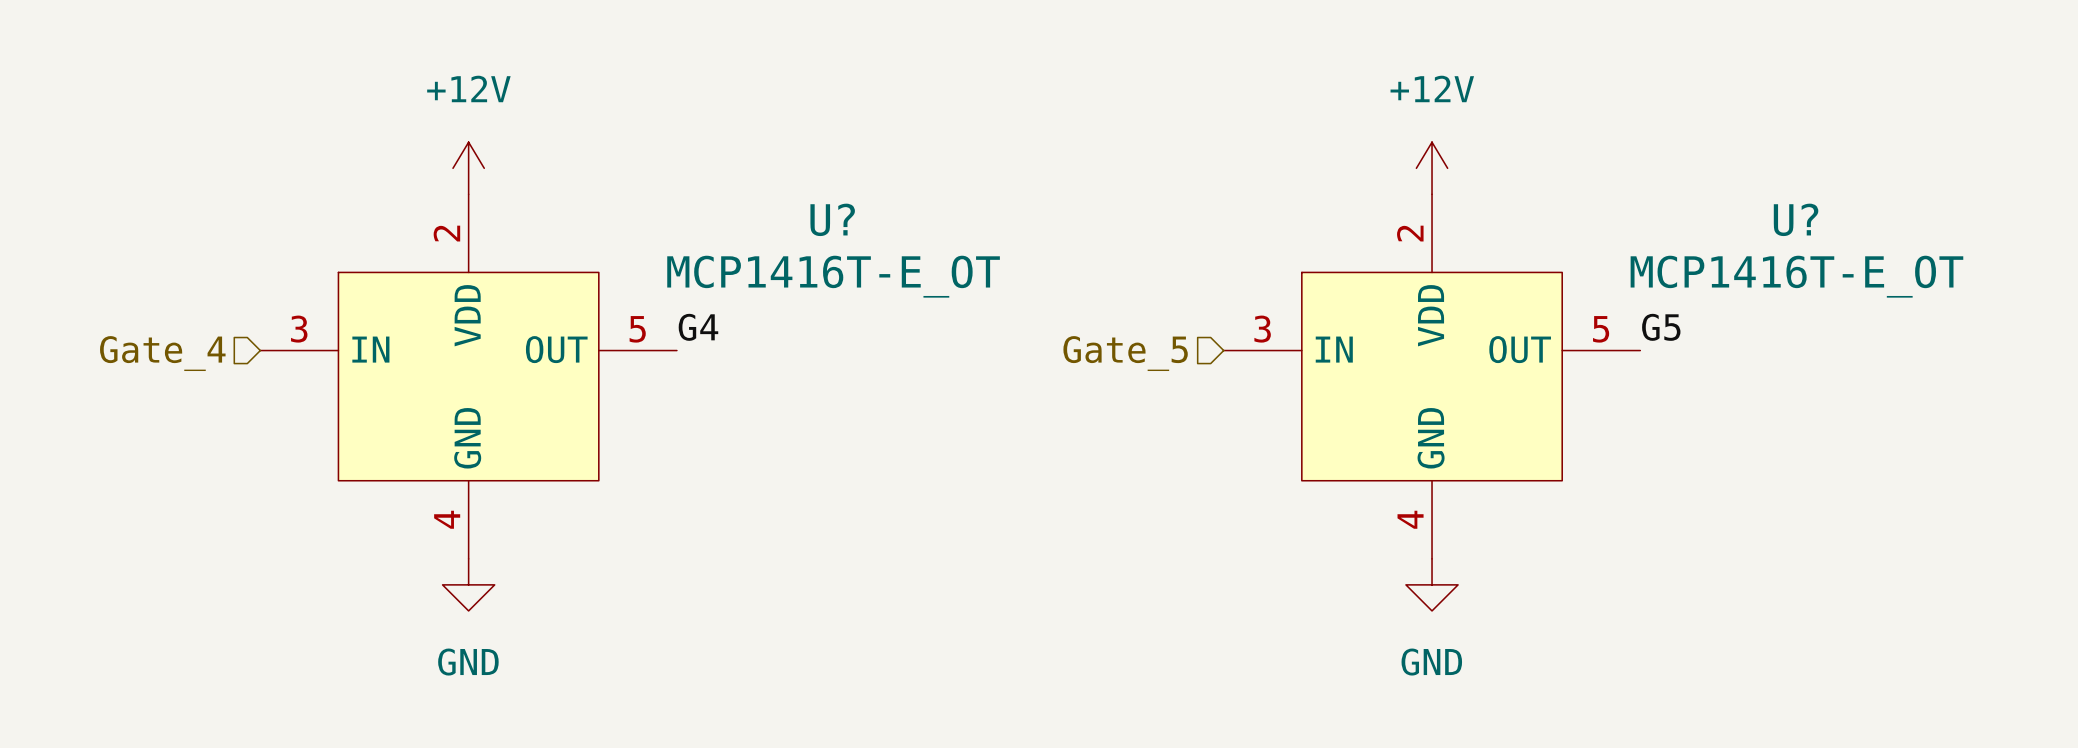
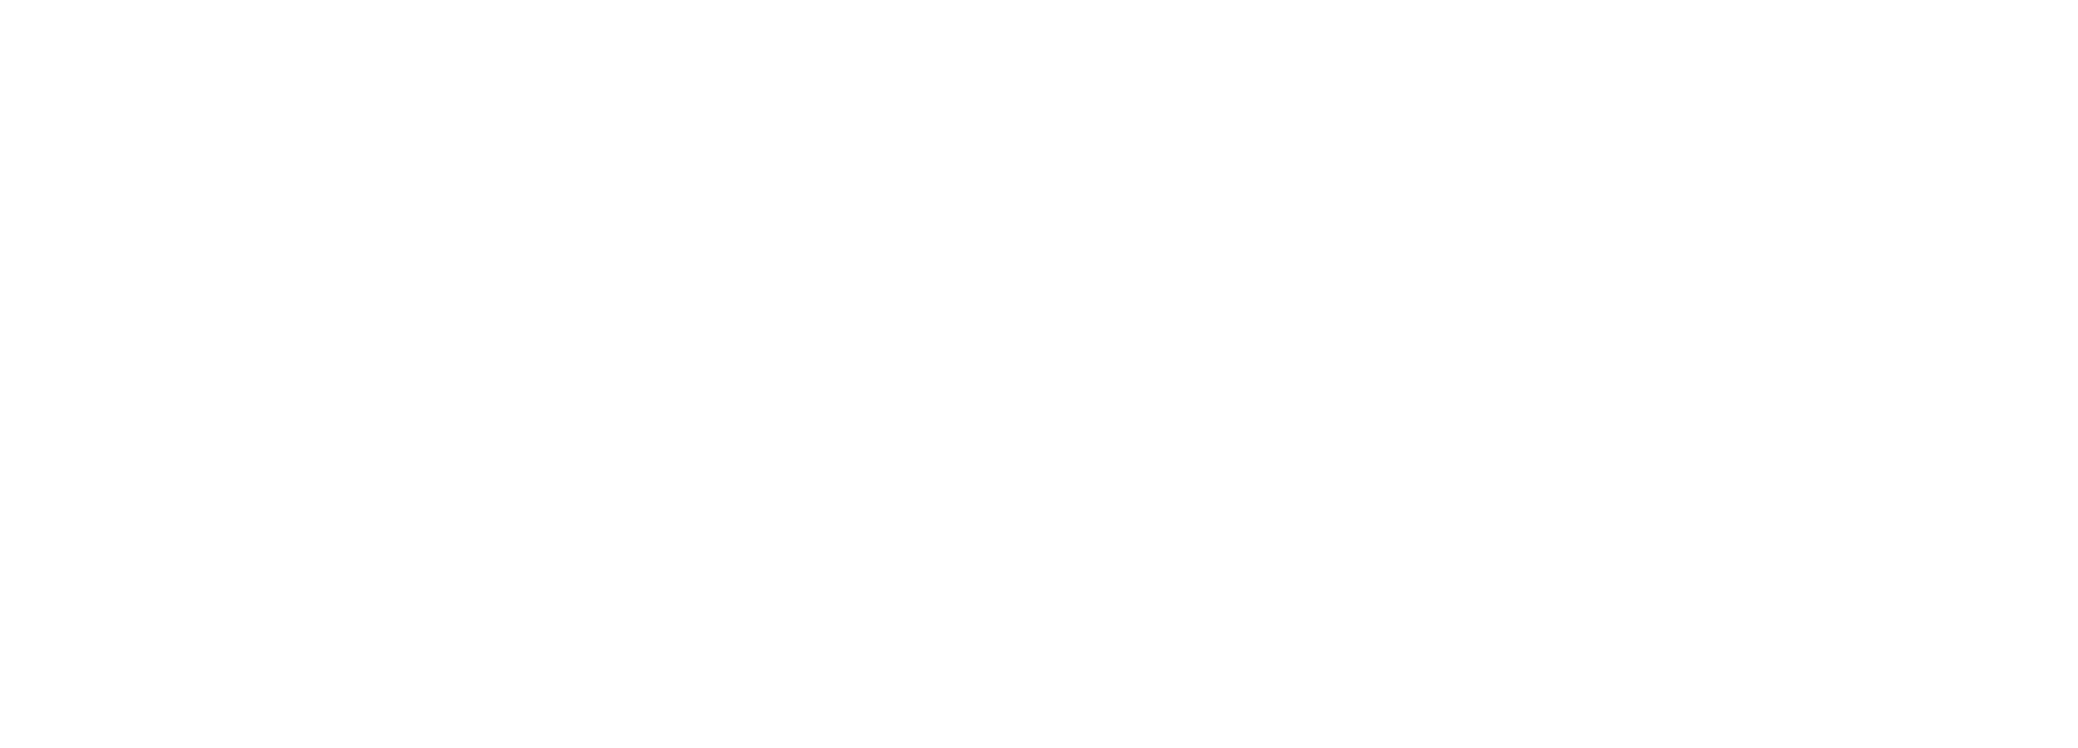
power symbol: +12V (468, 168) -> none
power symbol: +12V (1432, 168) -> none
label: G4 (698, 327) -> none
label: G5 (1661, 327) -> none
hierarchical label: Gate_4 (162, 353) -> none
hierarchical label: Gate_5 (1125, 353) -> none
U?: MCP1416T-E_OT (468, 376) -> none
U?: MCP1416T-E_OT (1432, 376) -> none
power symbol: GND (468, 584) -> none
power symbol: GND (1432, 584) -> none

